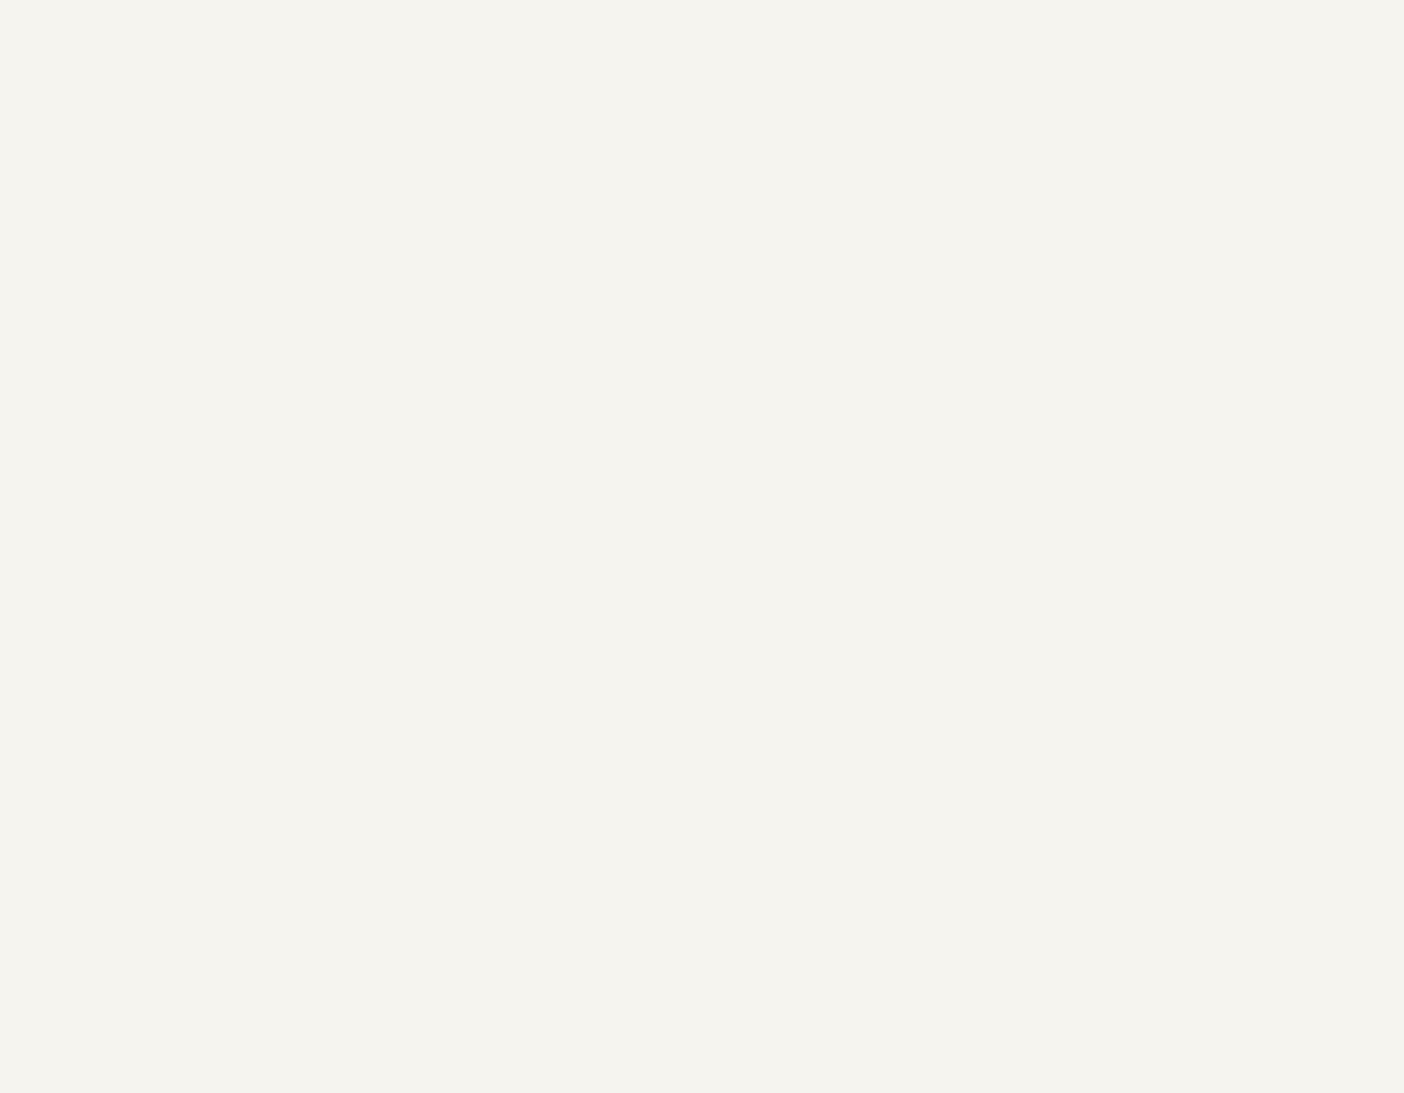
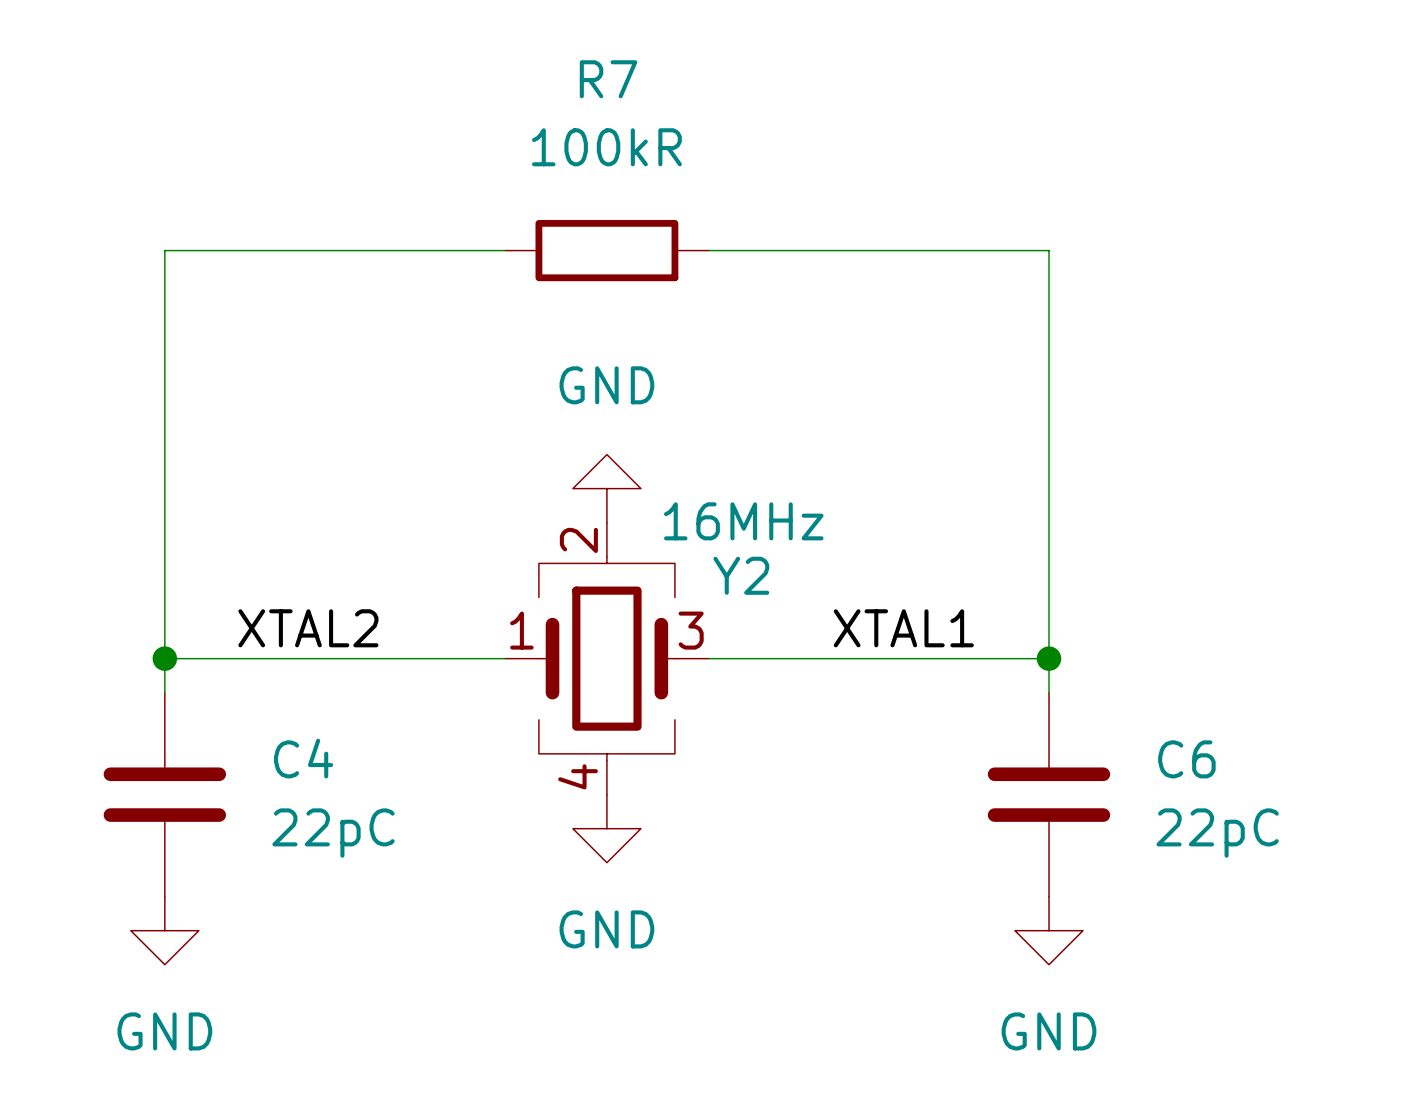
wire: none -> (504, 250) (164, 250) (164, 692)
R7: none -> 100kR (606, 250)
wire: none -> (708, 250) (1049, 250) (1049, 692)
power symbol: none -> GND (606, 488)
label: none -> XTAL2 (308, 628)
label: none -> XTAL1 (903, 628)
wire: none -> (164, 658) (504, 658)
junction: none -> (164, 658)
Y2: none -> 16MHz (606, 658)
wire: none -> (708, 658) (1049, 658)
junction: none -> (1049, 658)
C4: none -> 22pC (164, 794)
C6: none -> 22pC (1049, 794)
power symbol: none -> GND (606, 828)
power symbol: none -> GND (164, 930)
power symbol: none -> GND (1049, 930)

